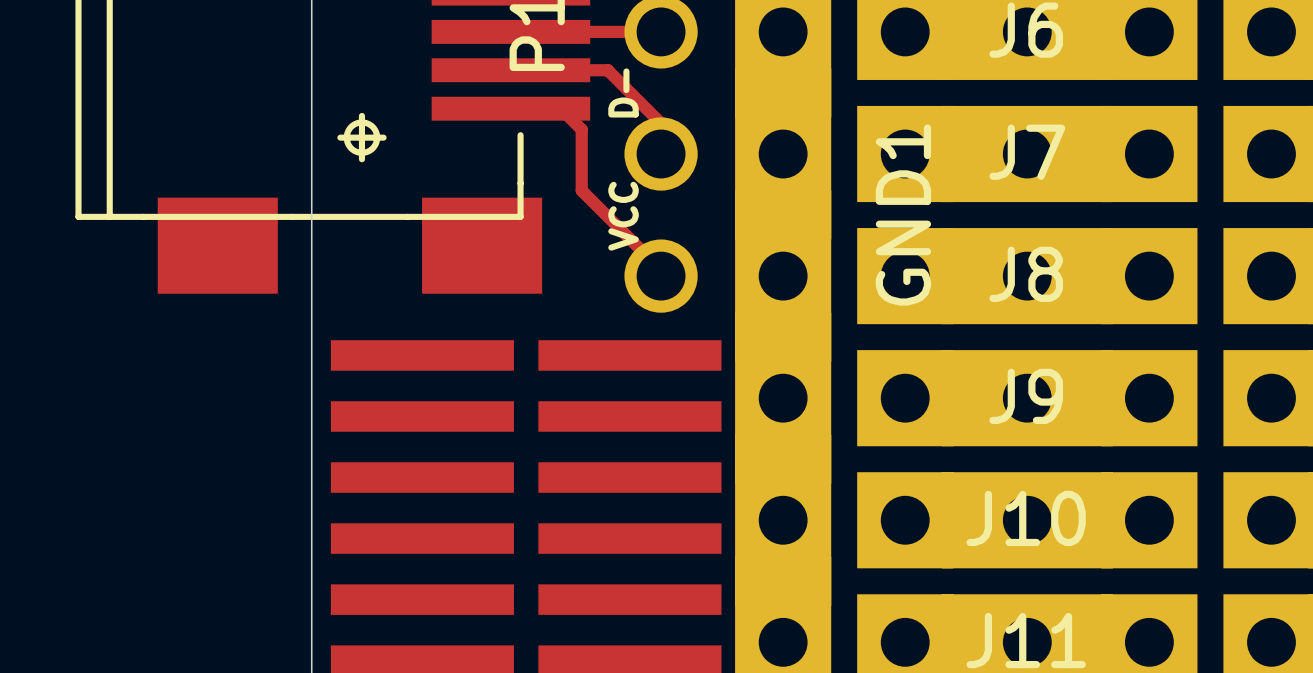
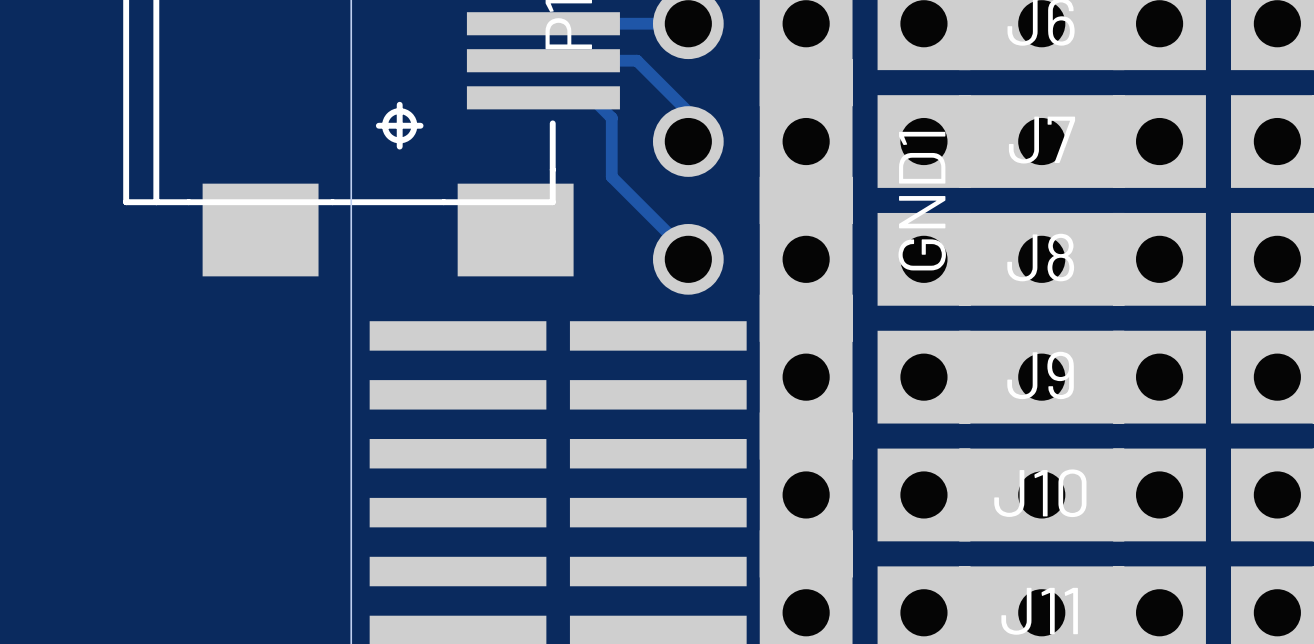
text: D- (623, 92) -> none
text: VCC (623, 216) -> none

